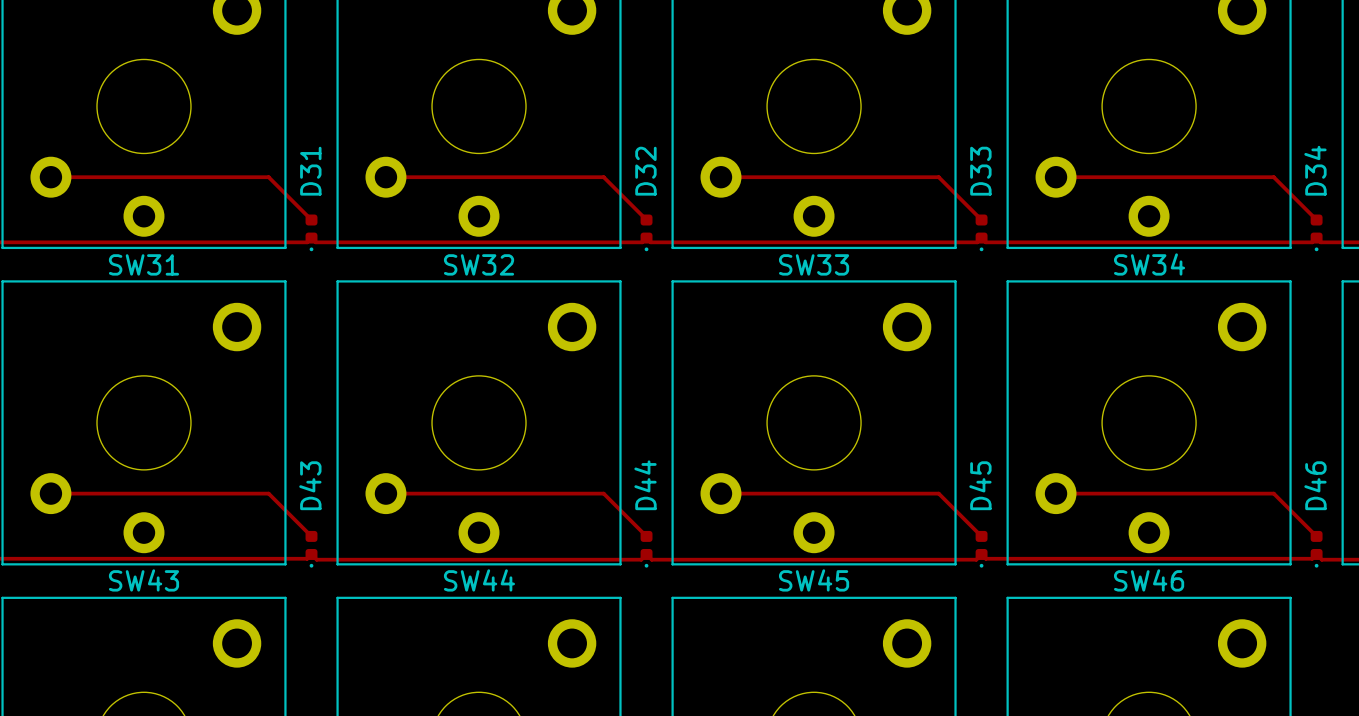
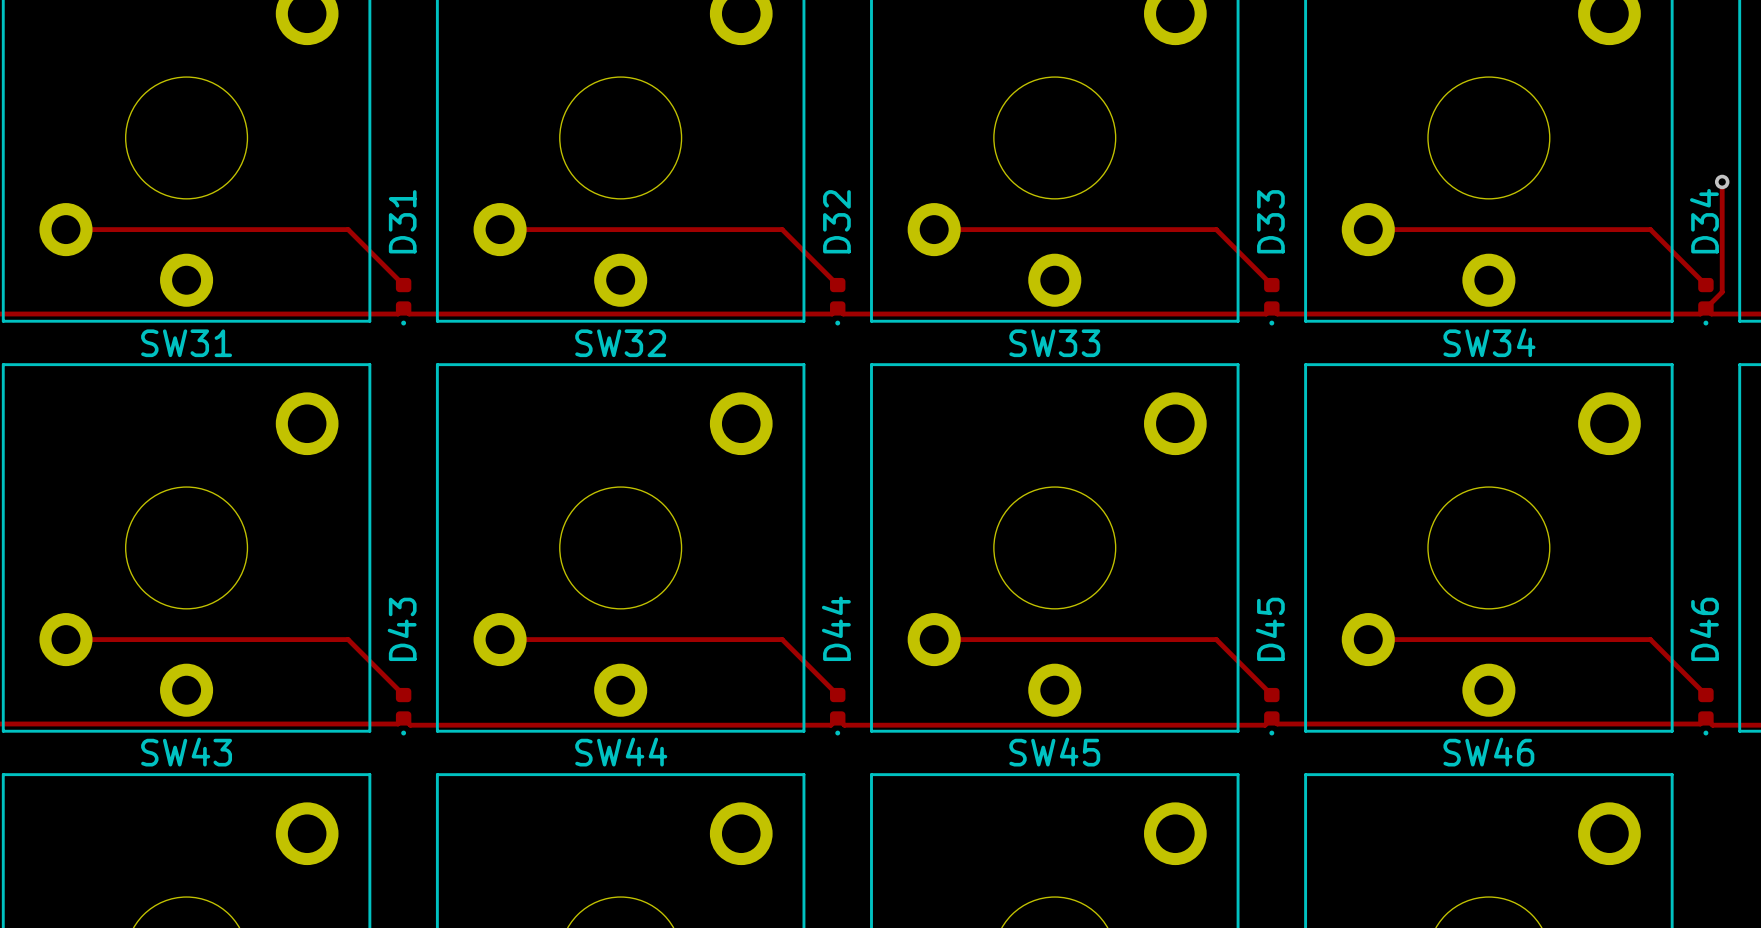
track: none -> (1722, 181) (1722, 292) (1705, 308)
via: none -> (1722, 181)

